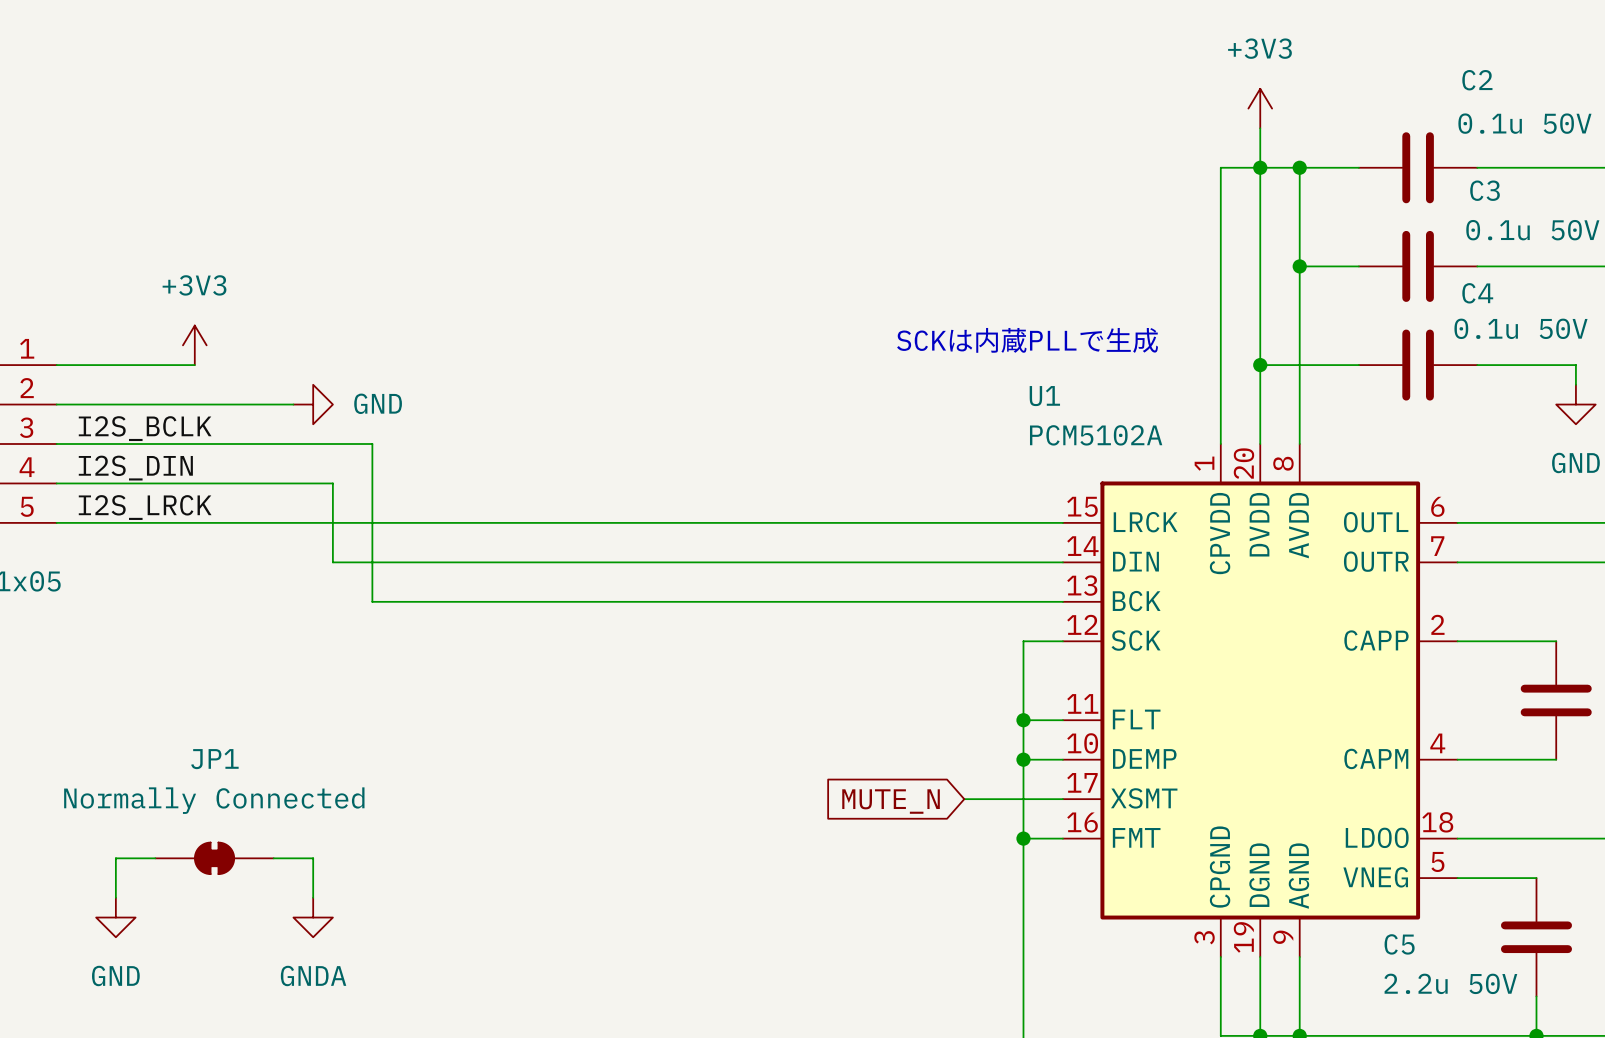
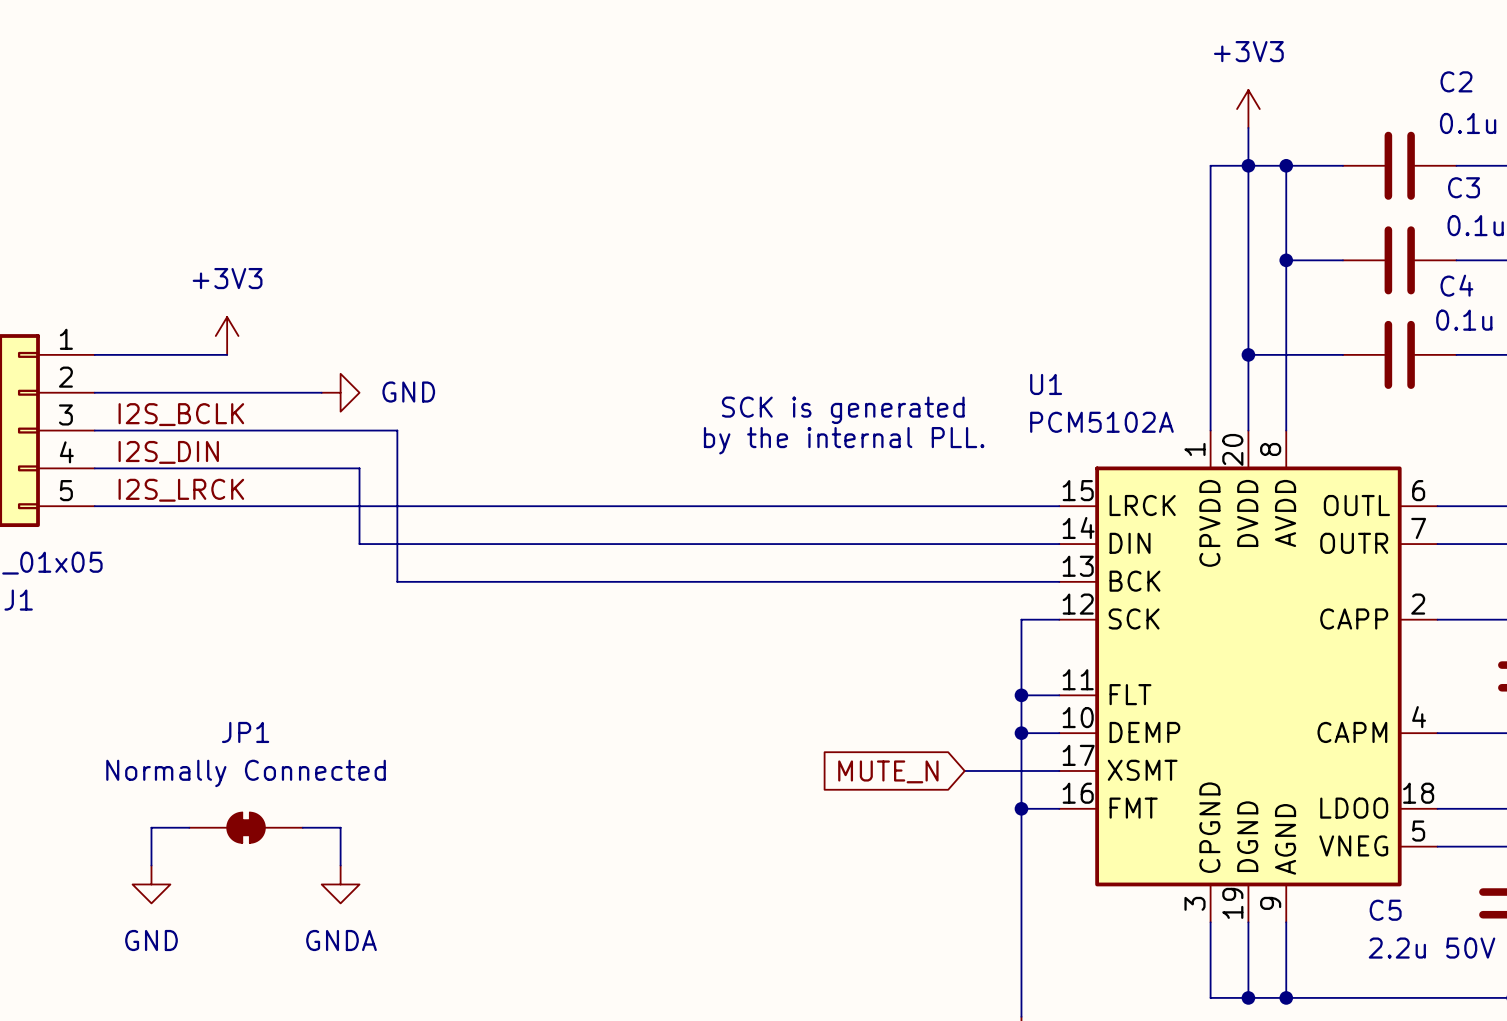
text: SCKは内蔵PLLで生成 (1027, 340) -> none
text: none -> SCK is generated (843, 410)
text: none -> by the internal PLL. (844, 440)

